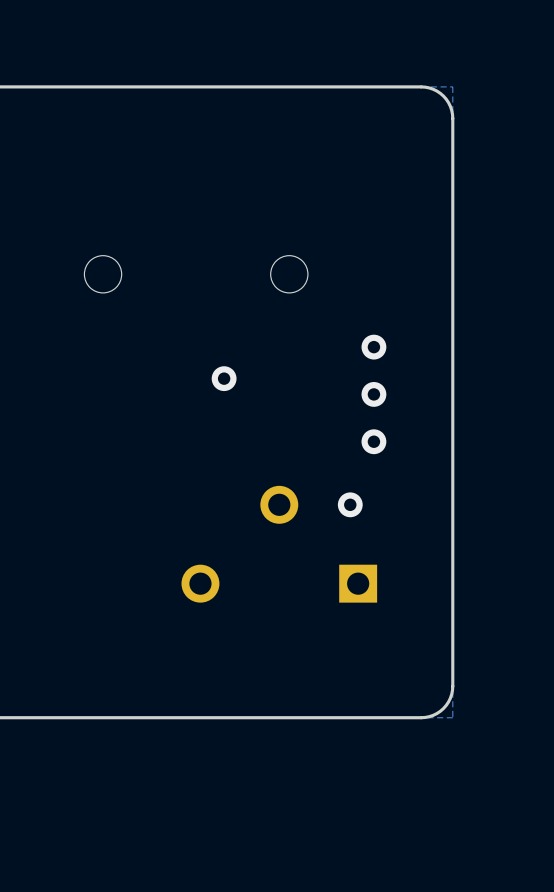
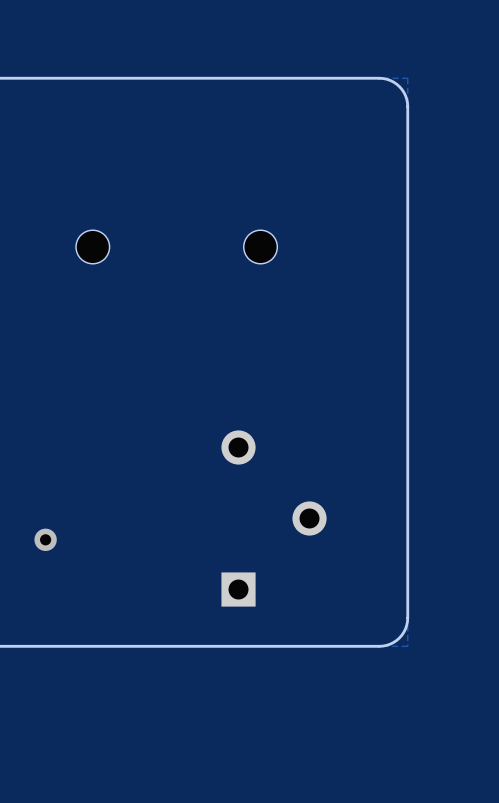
via: (373, 347) -> none
via: (224, 378) -> none
via: (373, 394) -> none
via: (373, 441) -> none
via: (350, 504) -> none
part rotation: 0° (279, 544) -> 90° clockwise (274, 518)
via: none -> (45, 539)

